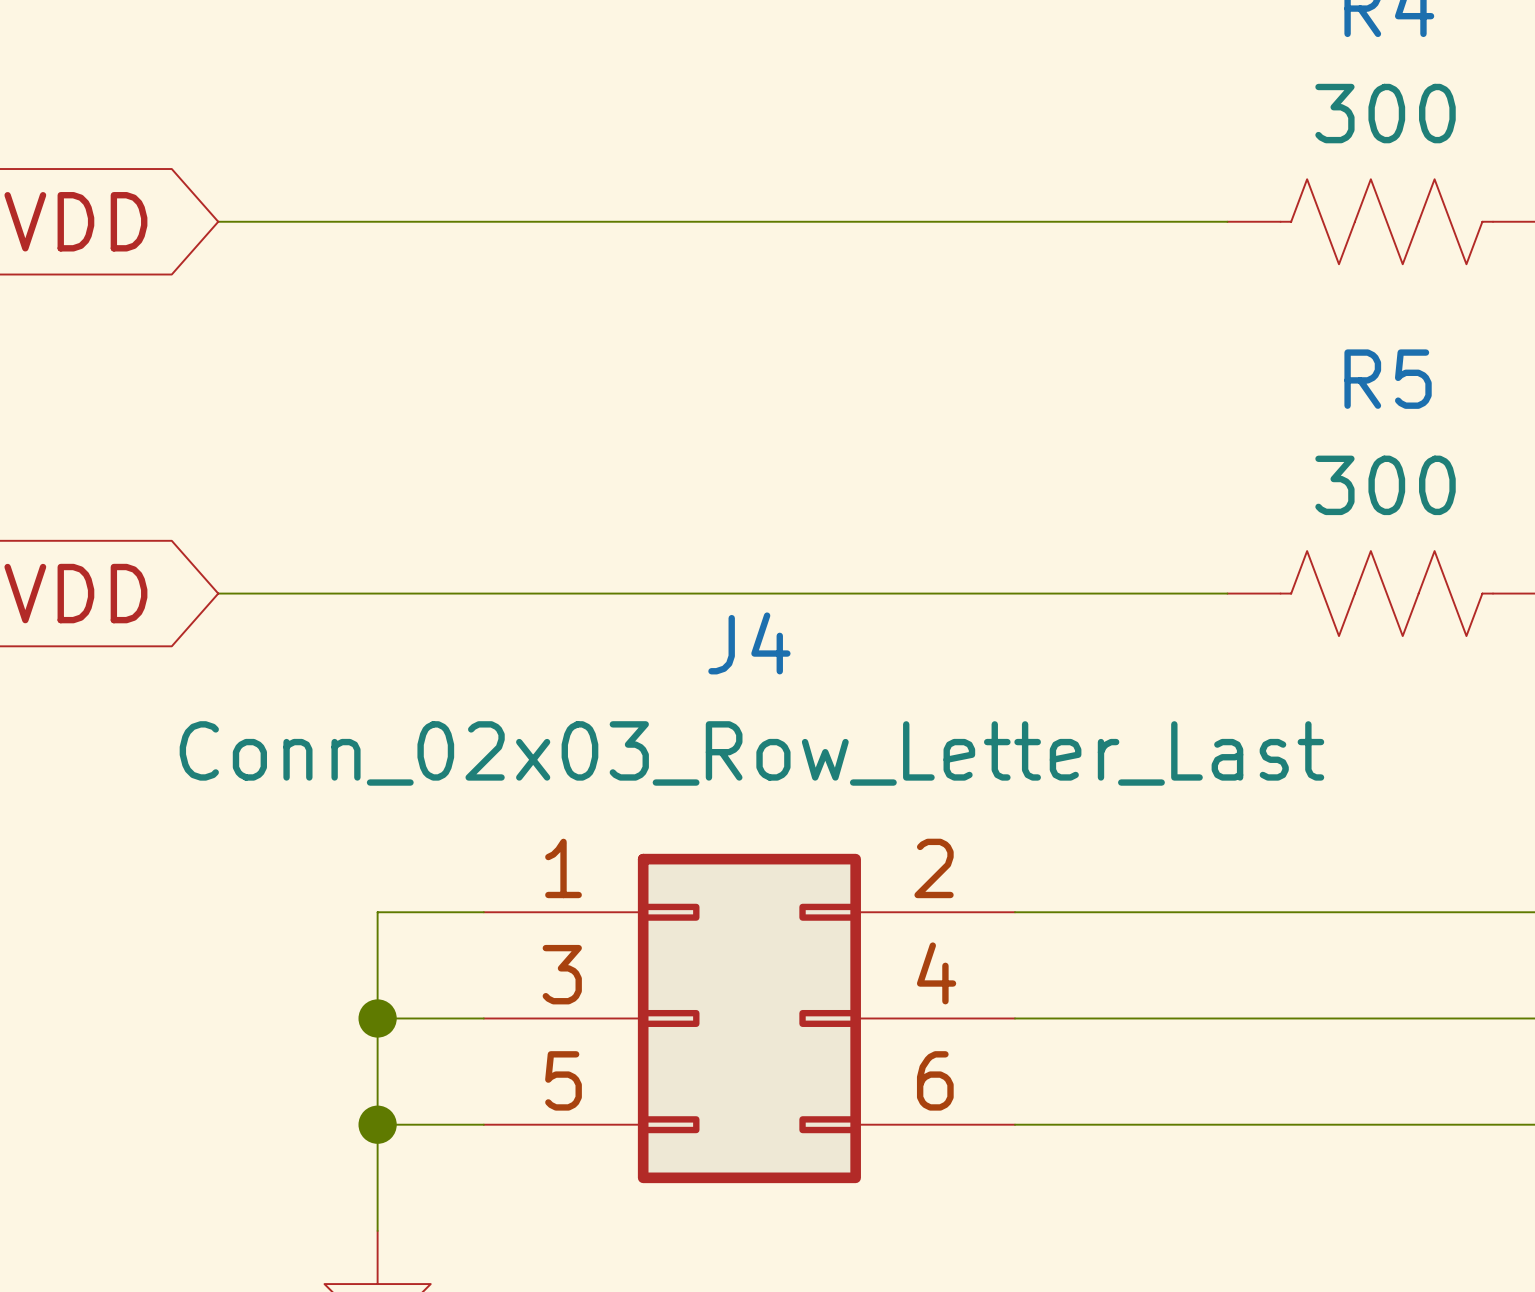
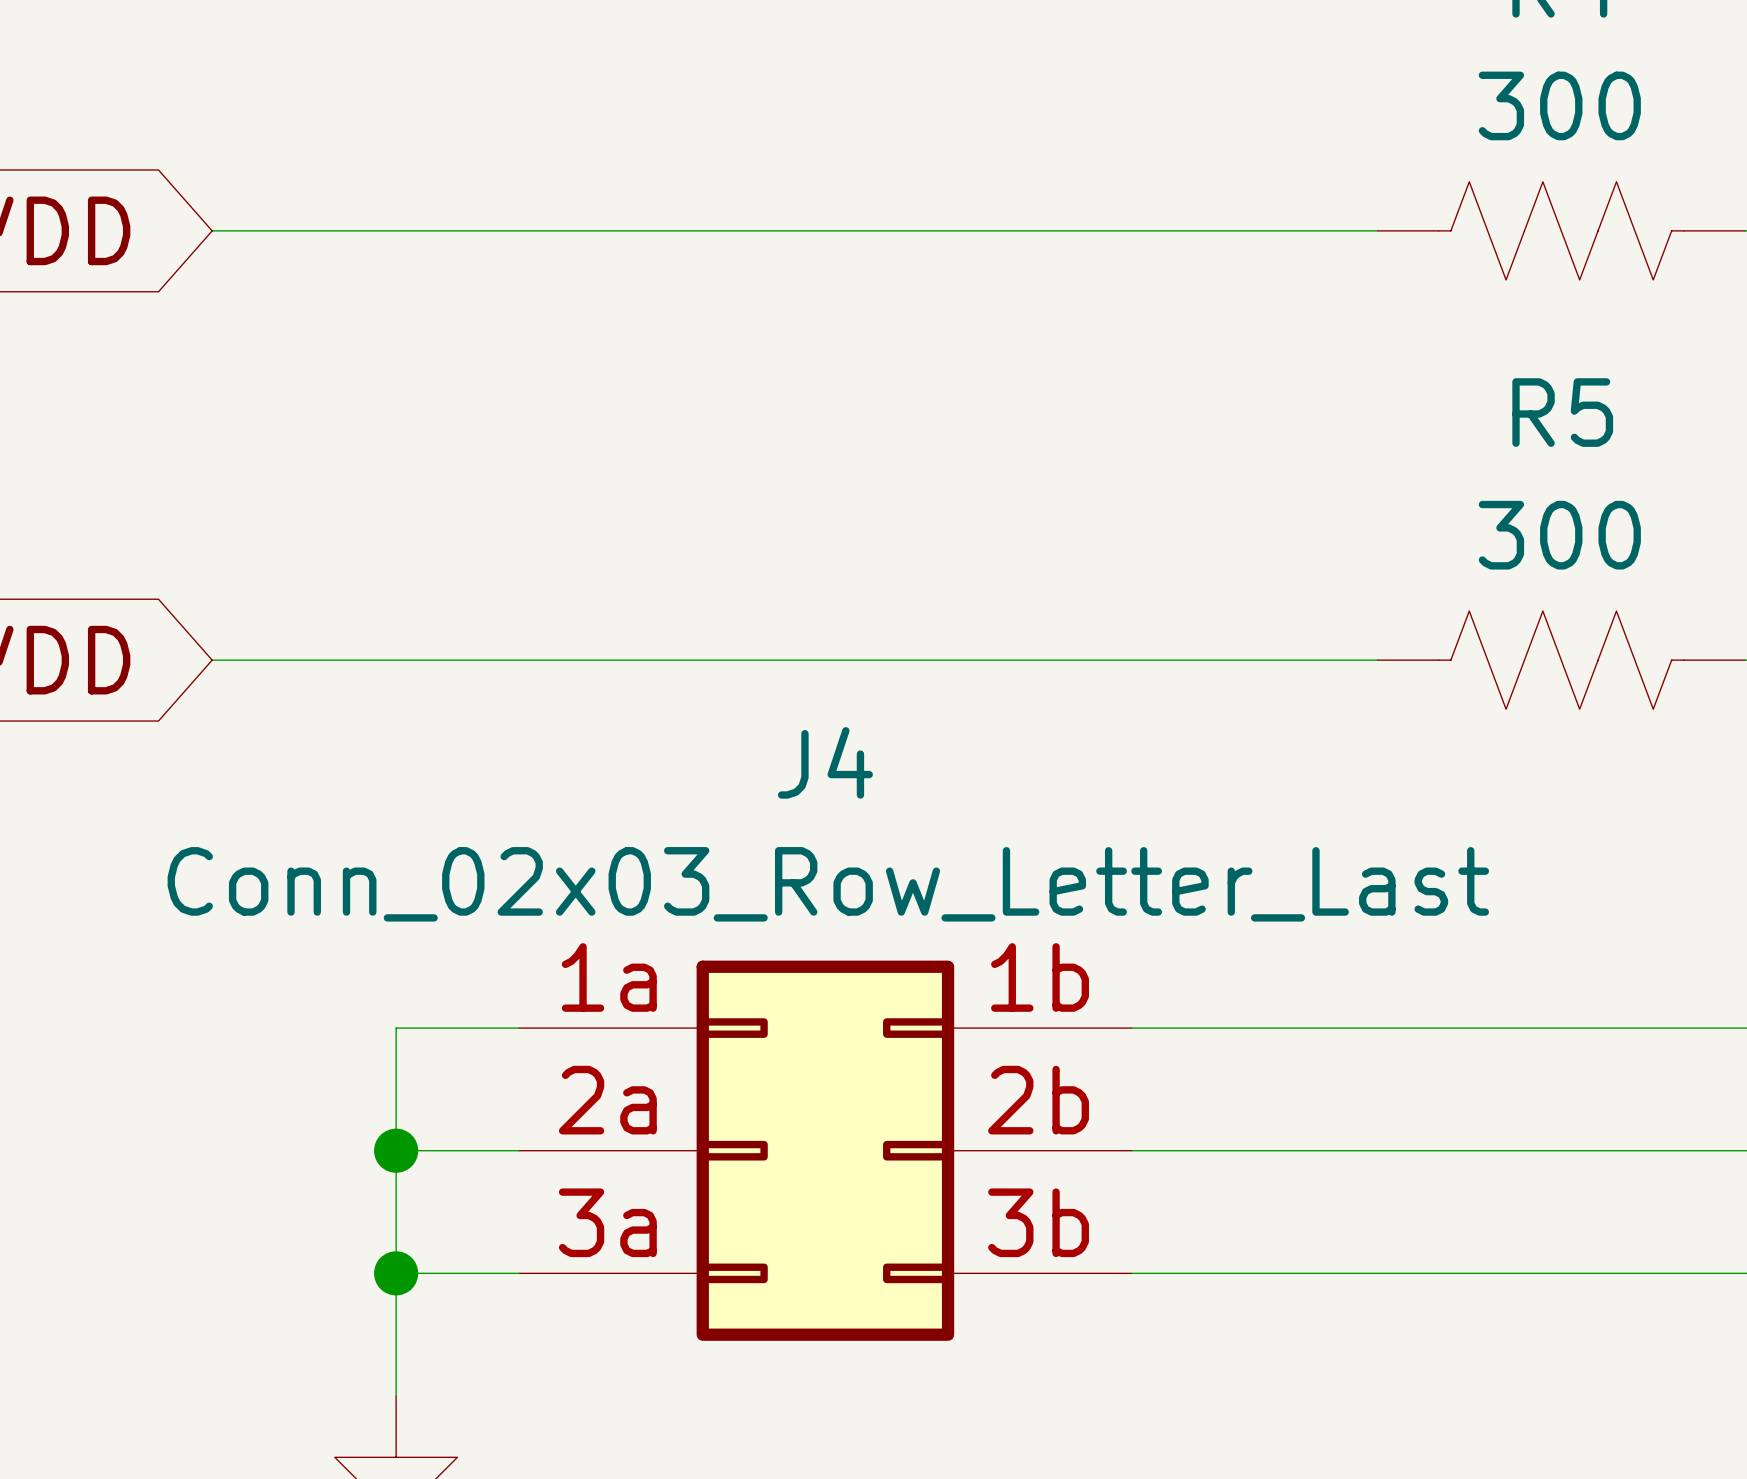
J4 name position: J4 (749, 643) -> J4 (825, 762)
J4 value position: Conn_02x03_Row_Letter_Last (751, 753) -> Conn_02x03_Row_Letter_Last (828, 884)
J4 pin number: 1 (563, 868) -> 1a (609, 977)
J4 pin number: 2 (934, 868) -> 1b (1040, 977)
J4 pin number: 4 (936, 973) -> 2b (1038, 1100)
J4 pin number: 3 (562, 974) -> 2a (607, 1100)
J4 pin number: 5 (563, 1080) -> 3a (607, 1222)
J4 pin number: 6 (935, 1080) -> 3b (1038, 1222)

